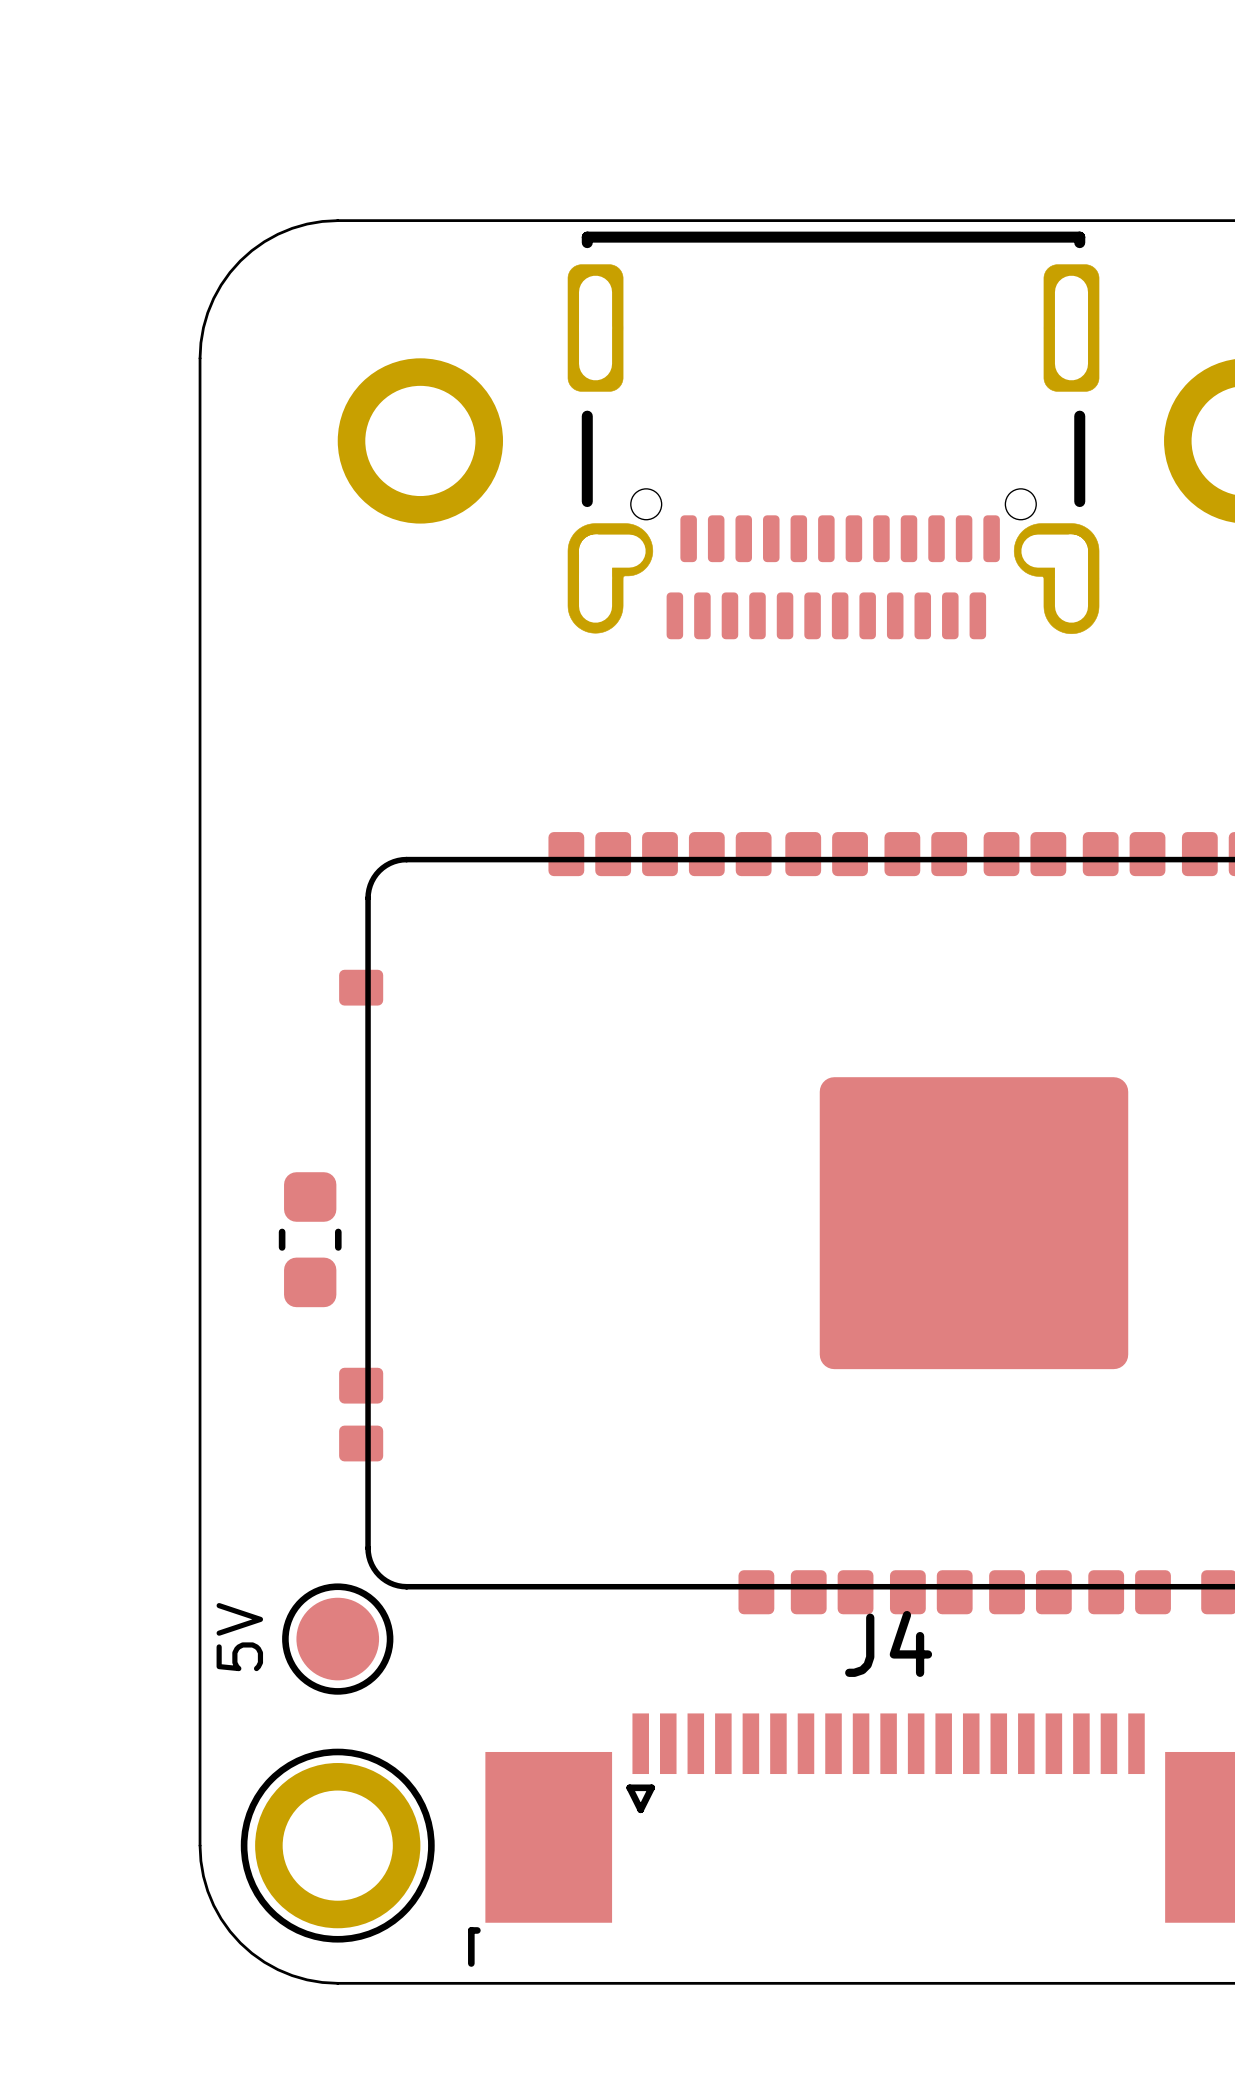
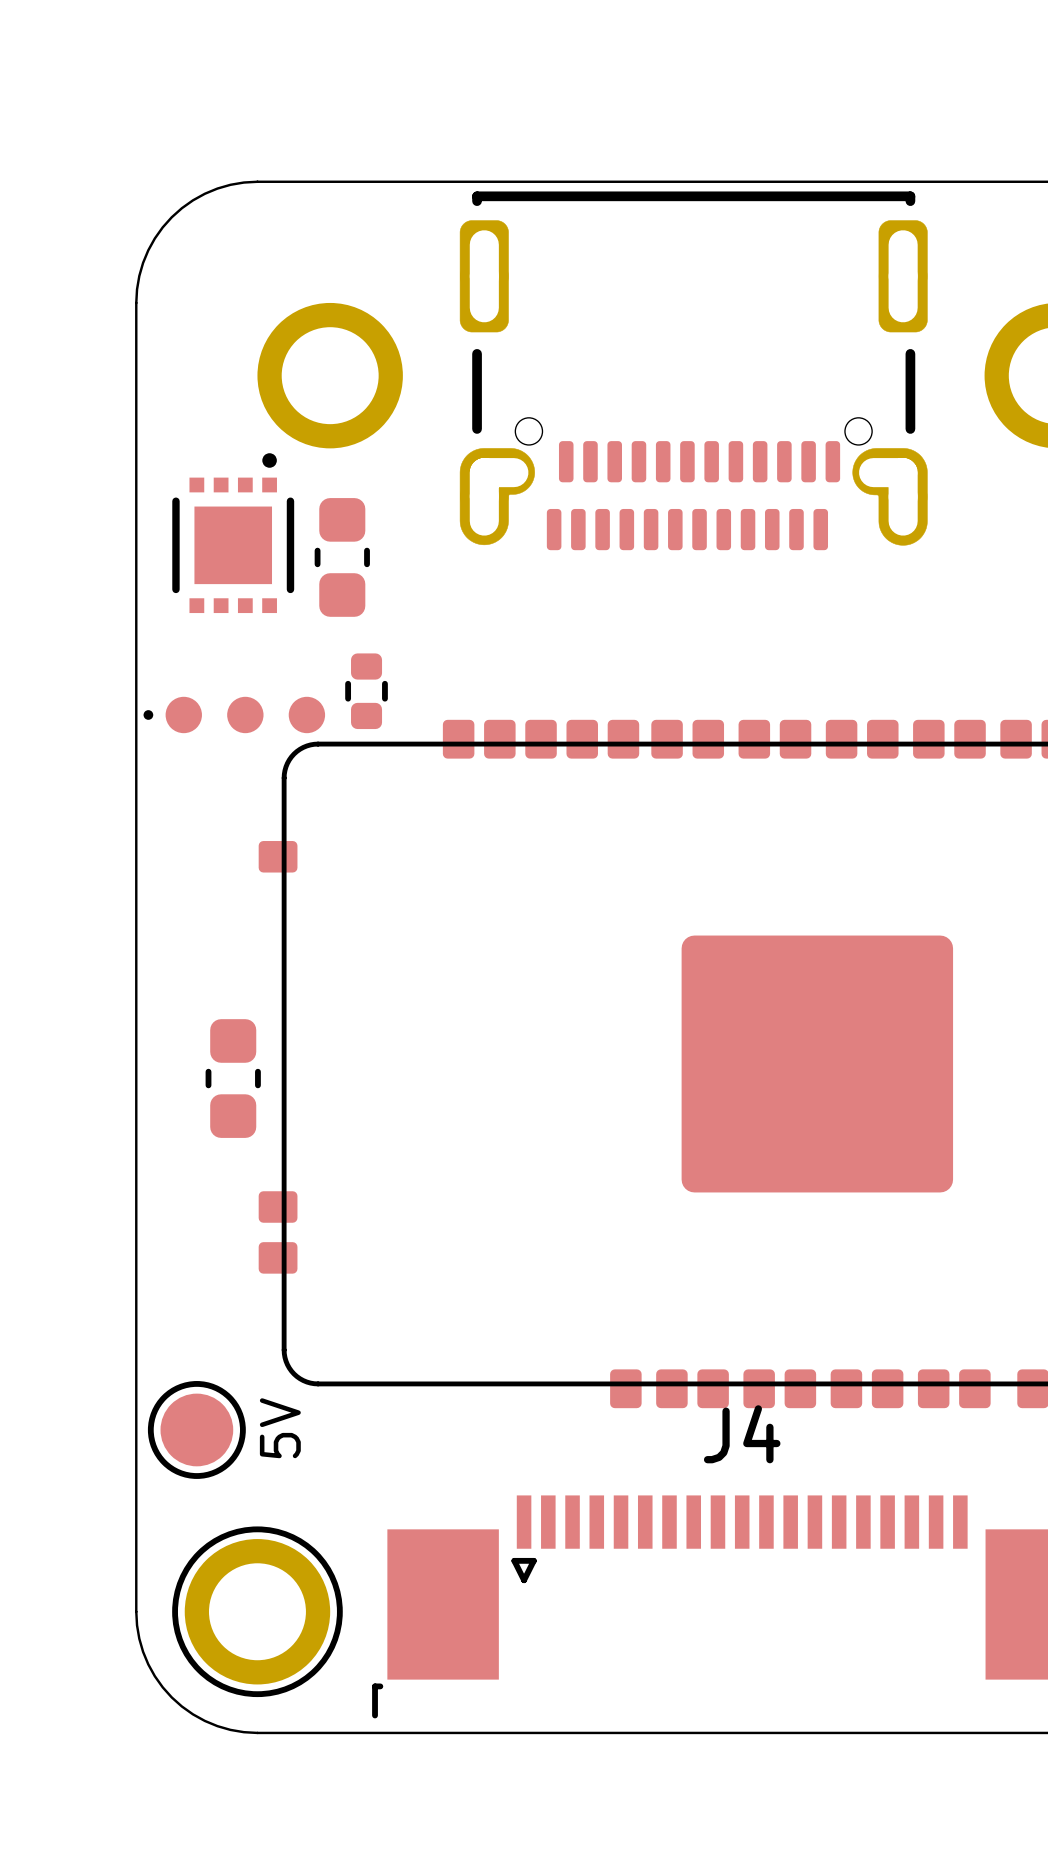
part: none -> (233, 533)
part: none -> (342, 557)
part: none -> (366, 691)
part: none -> (234, 714)
part value position: 5V (239, 1637) -> 5V (280, 1428)
part position: (337, 1639) -> (196, 1429)

